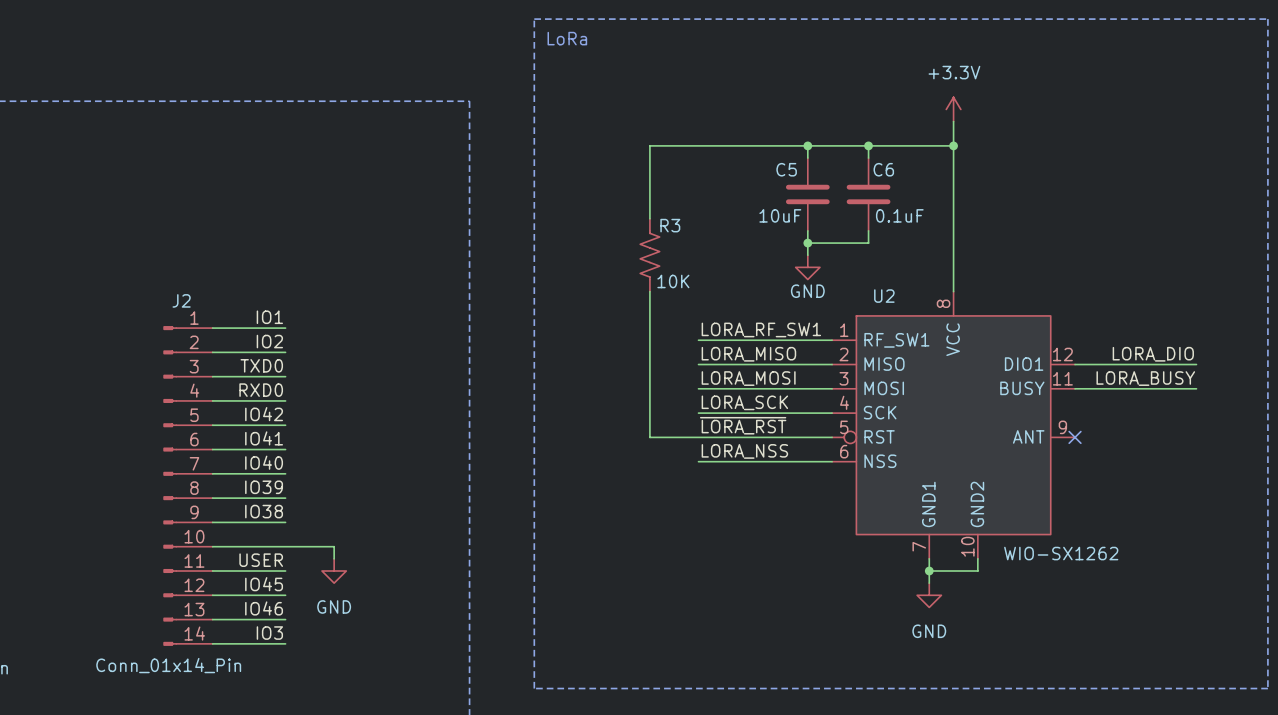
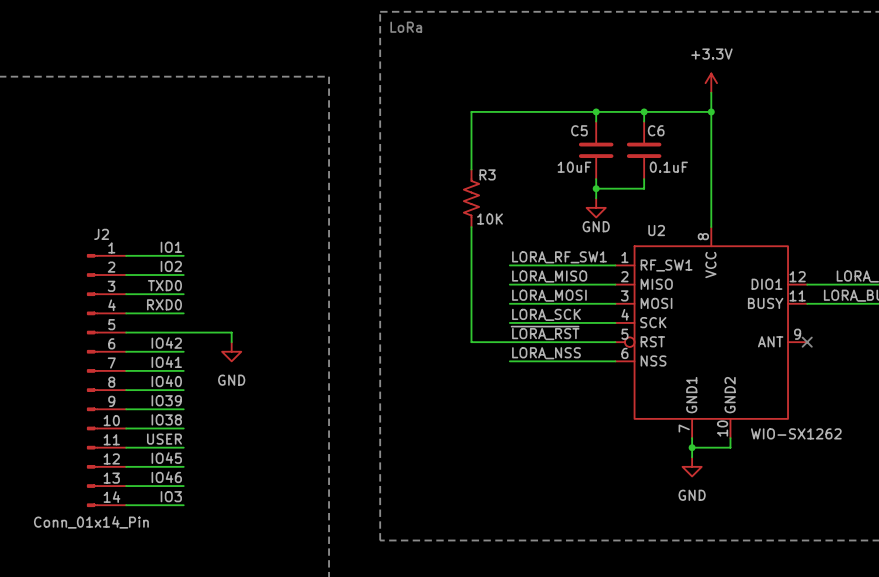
label: IO42 (264, 414) -> none
wire: none -> (183, 332) (231, 332) (231, 342)
label: IO41 (264, 438) -> IO42 (166, 342)
label: IO40 (264, 462) -> IO41 (166, 362)
label: IO39 (264, 487) -> IO40 (166, 381)
label: IO38 (264, 511) -> IO39 (166, 400)
label: none -> IO38 (166, 419)
wire: (285, 546) (334, 546) (334, 558) -> none
power symbol position: GND (334, 571) -> GND (231, 351)

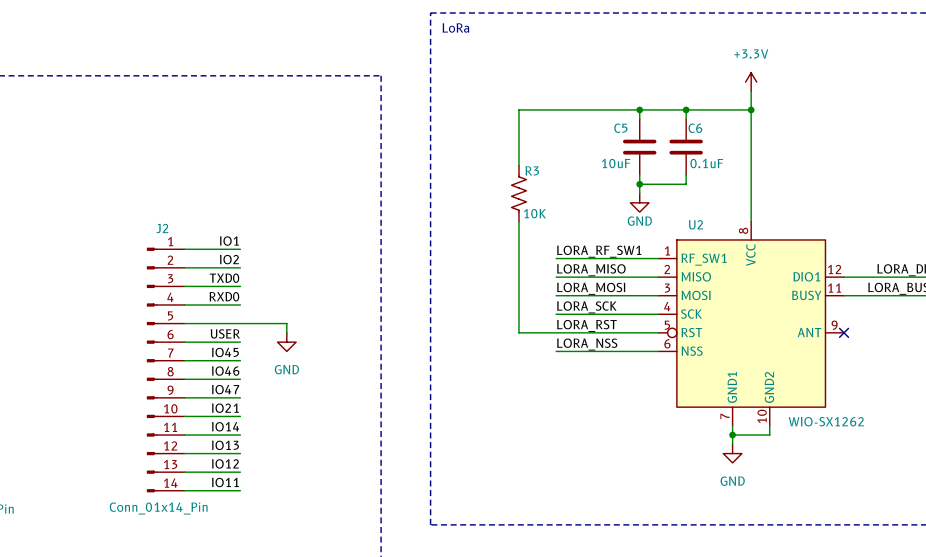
label: ~{LORA_RST} (545, 332) -> LORA_RST (586, 325)
label: IO42 (166, 342) -> USER (225, 333)
label: IO41 (166, 362) -> IO45 (225, 352)
label: IO40 (166, 381) -> IO46 (225, 371)
label: IO39 (166, 400) -> IO47 (225, 389)
label: IO38 (166, 419) -> IO21 (225, 408)
label: USER (164, 439) -> IO14 (225, 426)
label: IO45 (166, 458) -> IO13 (225, 445)
label: IO46 (166, 477) -> IO12 (225, 463)
label: IO3 (171, 496) -> IO11 (225, 482)

